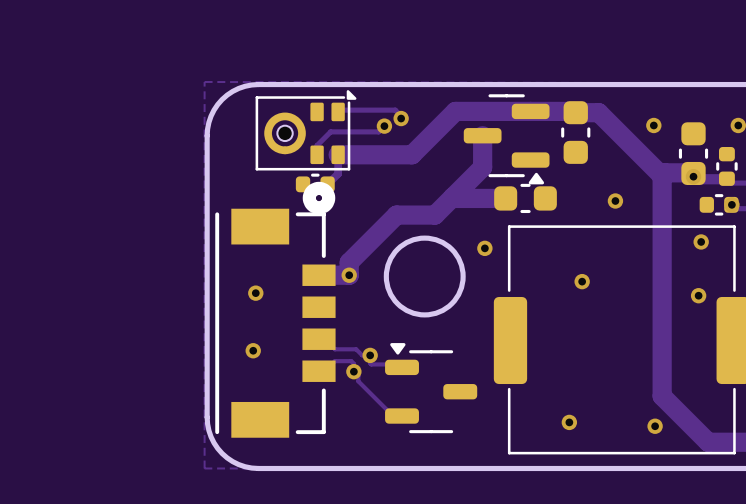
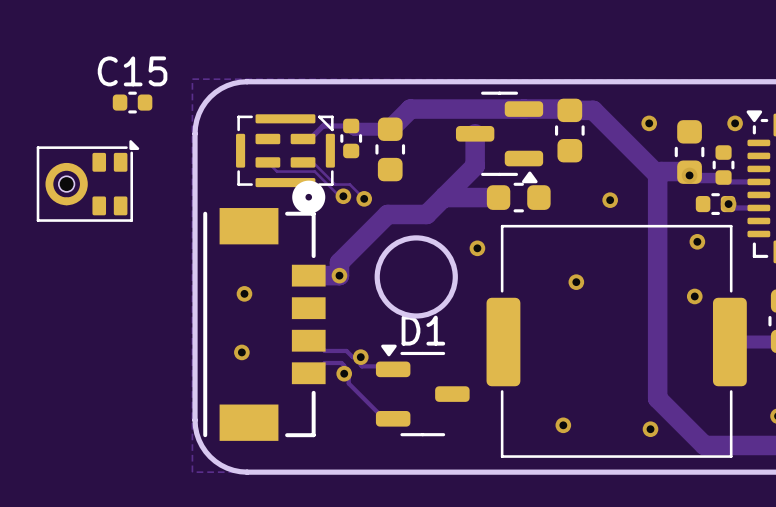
C15: none -> (132, 102)
track: (338, 111) (339, 110) (395, 110) (401, 118) -> none
track: (455, 111) (412, 154) (338, 154) (338, 173) (327, 184) -> (447, 109) (410, 109) (390, 129) (354, 129) (351, 125) (323, 125) (310, 139) (303, 139)
via: (401, 118) -> none
track: (384, 126) (378, 131) (330, 131) (317, 145) (317, 154) -> none
via: (384, 126) -> none
part position: (306, 130) -> (87, 180)
part: none -> (390, 149)
part: none -> (285, 150)
track: none -> (267, 162) (277, 171) (314, 171) (339, 196) (343, 196)
track: none -> (303, 162) (313, 162) (335, 184) (349, 184) (364, 198)
part rotation: 0° (315, 184) -> 90° clockwise (351, 138)
part position: (315, 184) -> (351, 138)
via: none -> (343, 196)
via: none -> (364, 198)
D1 name: none -> D1 (423, 330)

